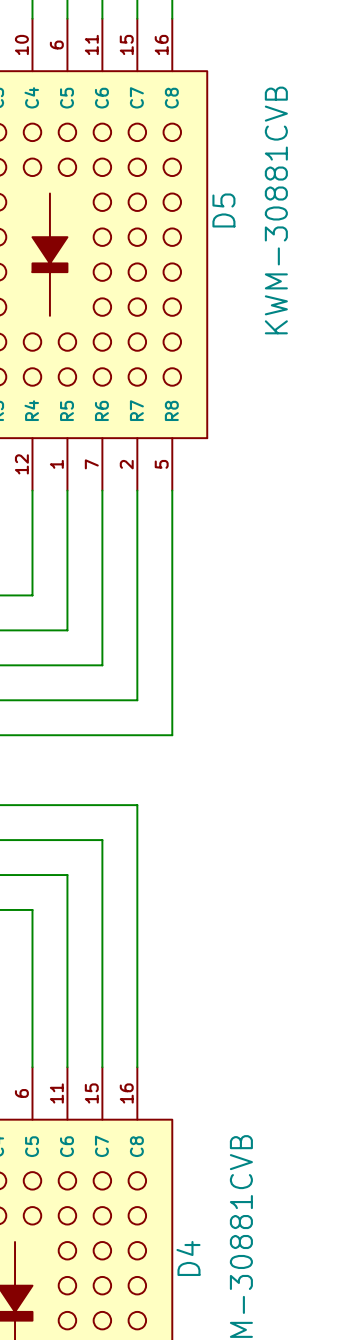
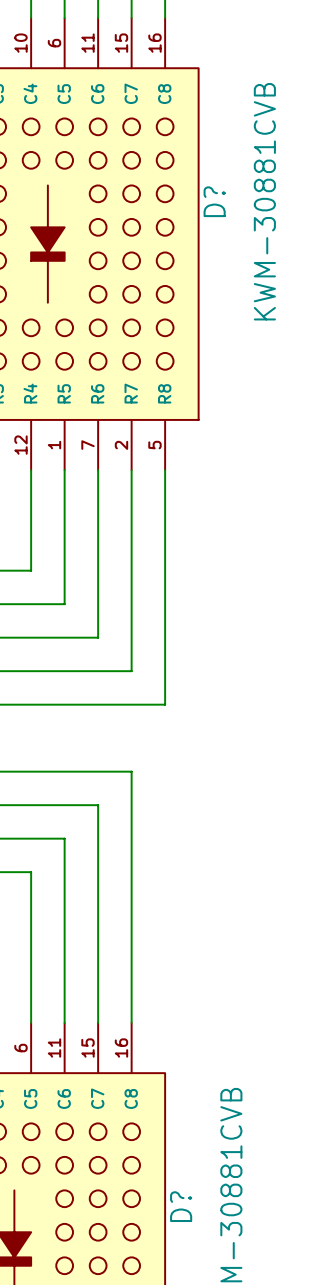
D5 name: D5 (223, 210) -> D? (214, 201)
D4 name: D4 (188, 1258) -> D? (181, 1206)

